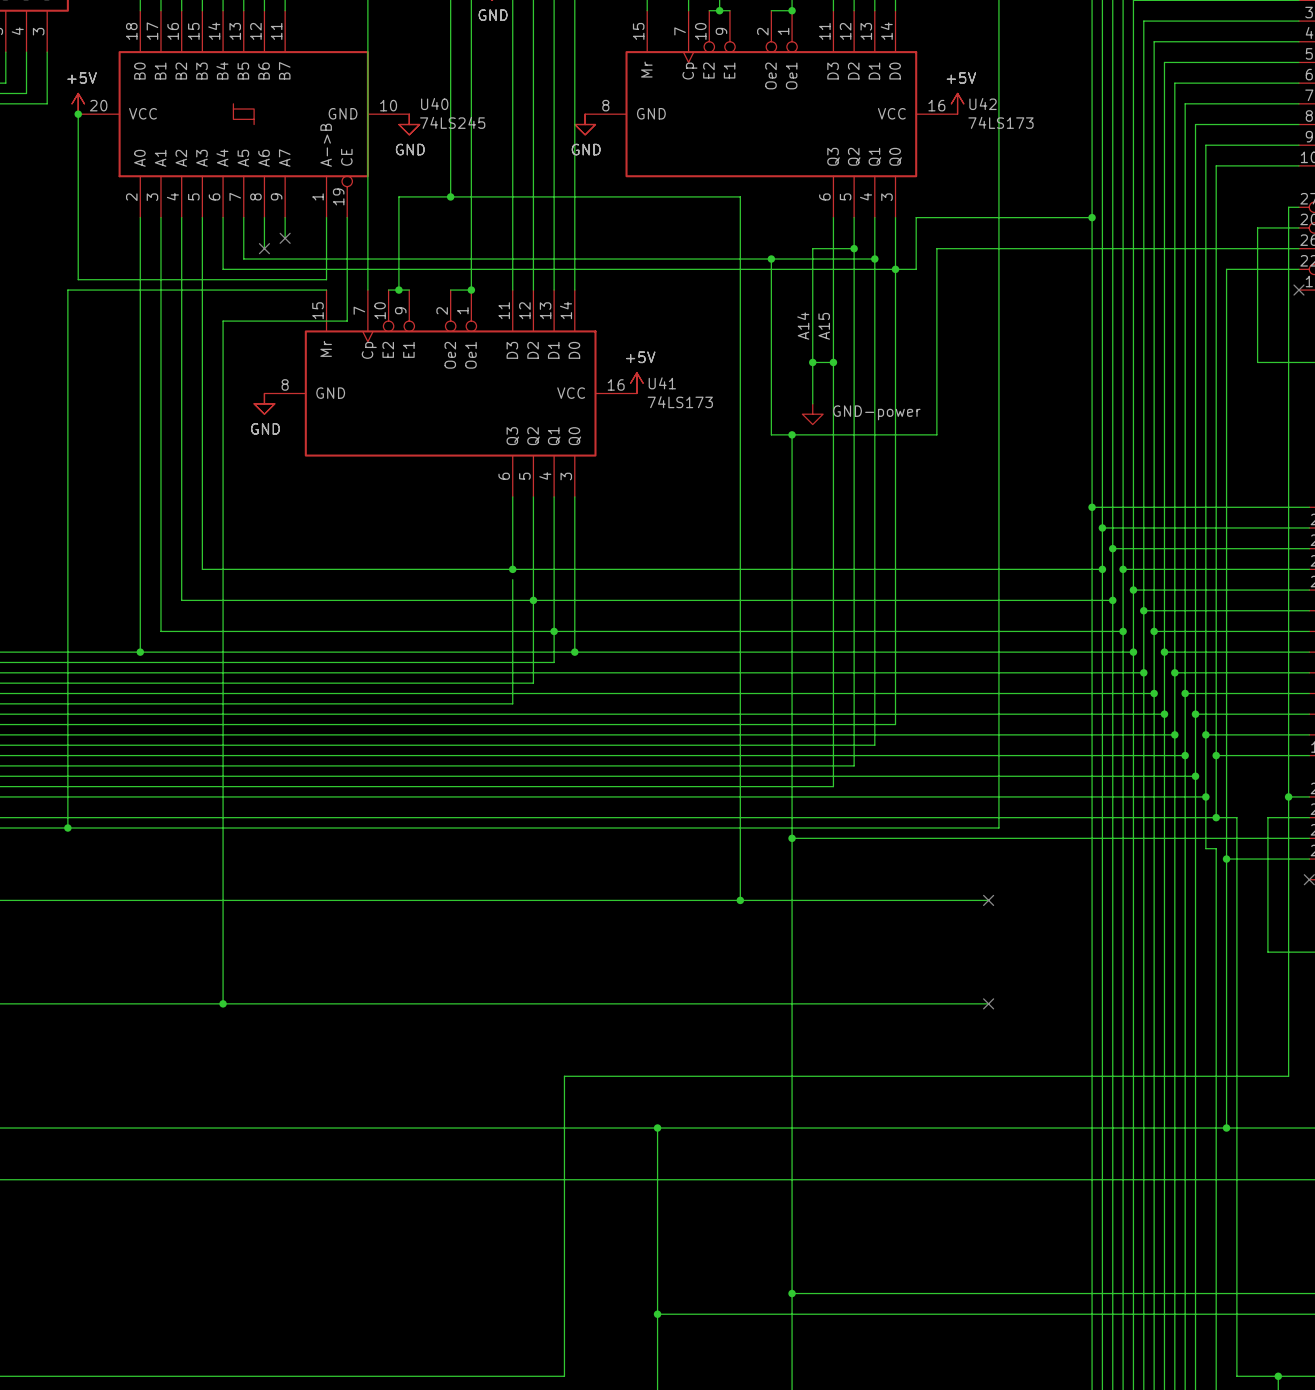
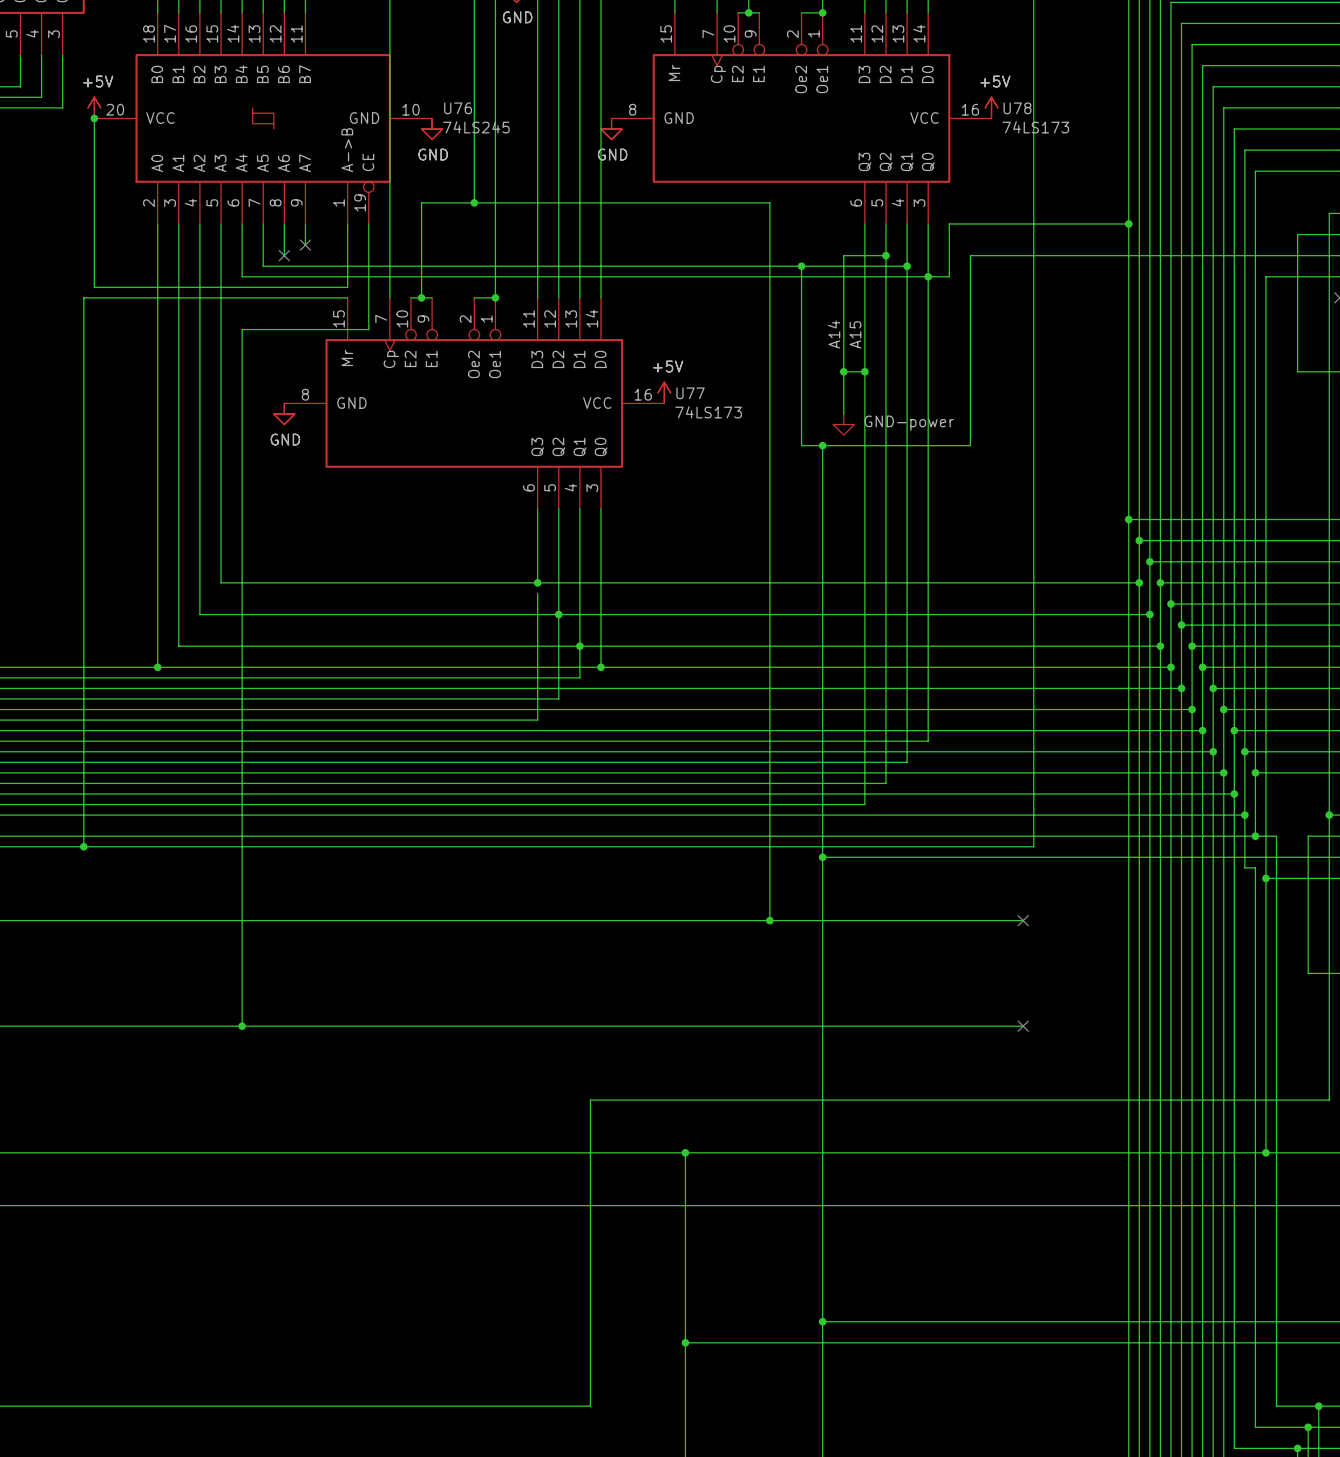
U40 name: U40 (434, 104) -> U76 (458, 108)
U42 name: U42 (983, 104) -> U78 (1017, 108)
U41 name: U41 (662, 383) -> U77 (690, 393)

